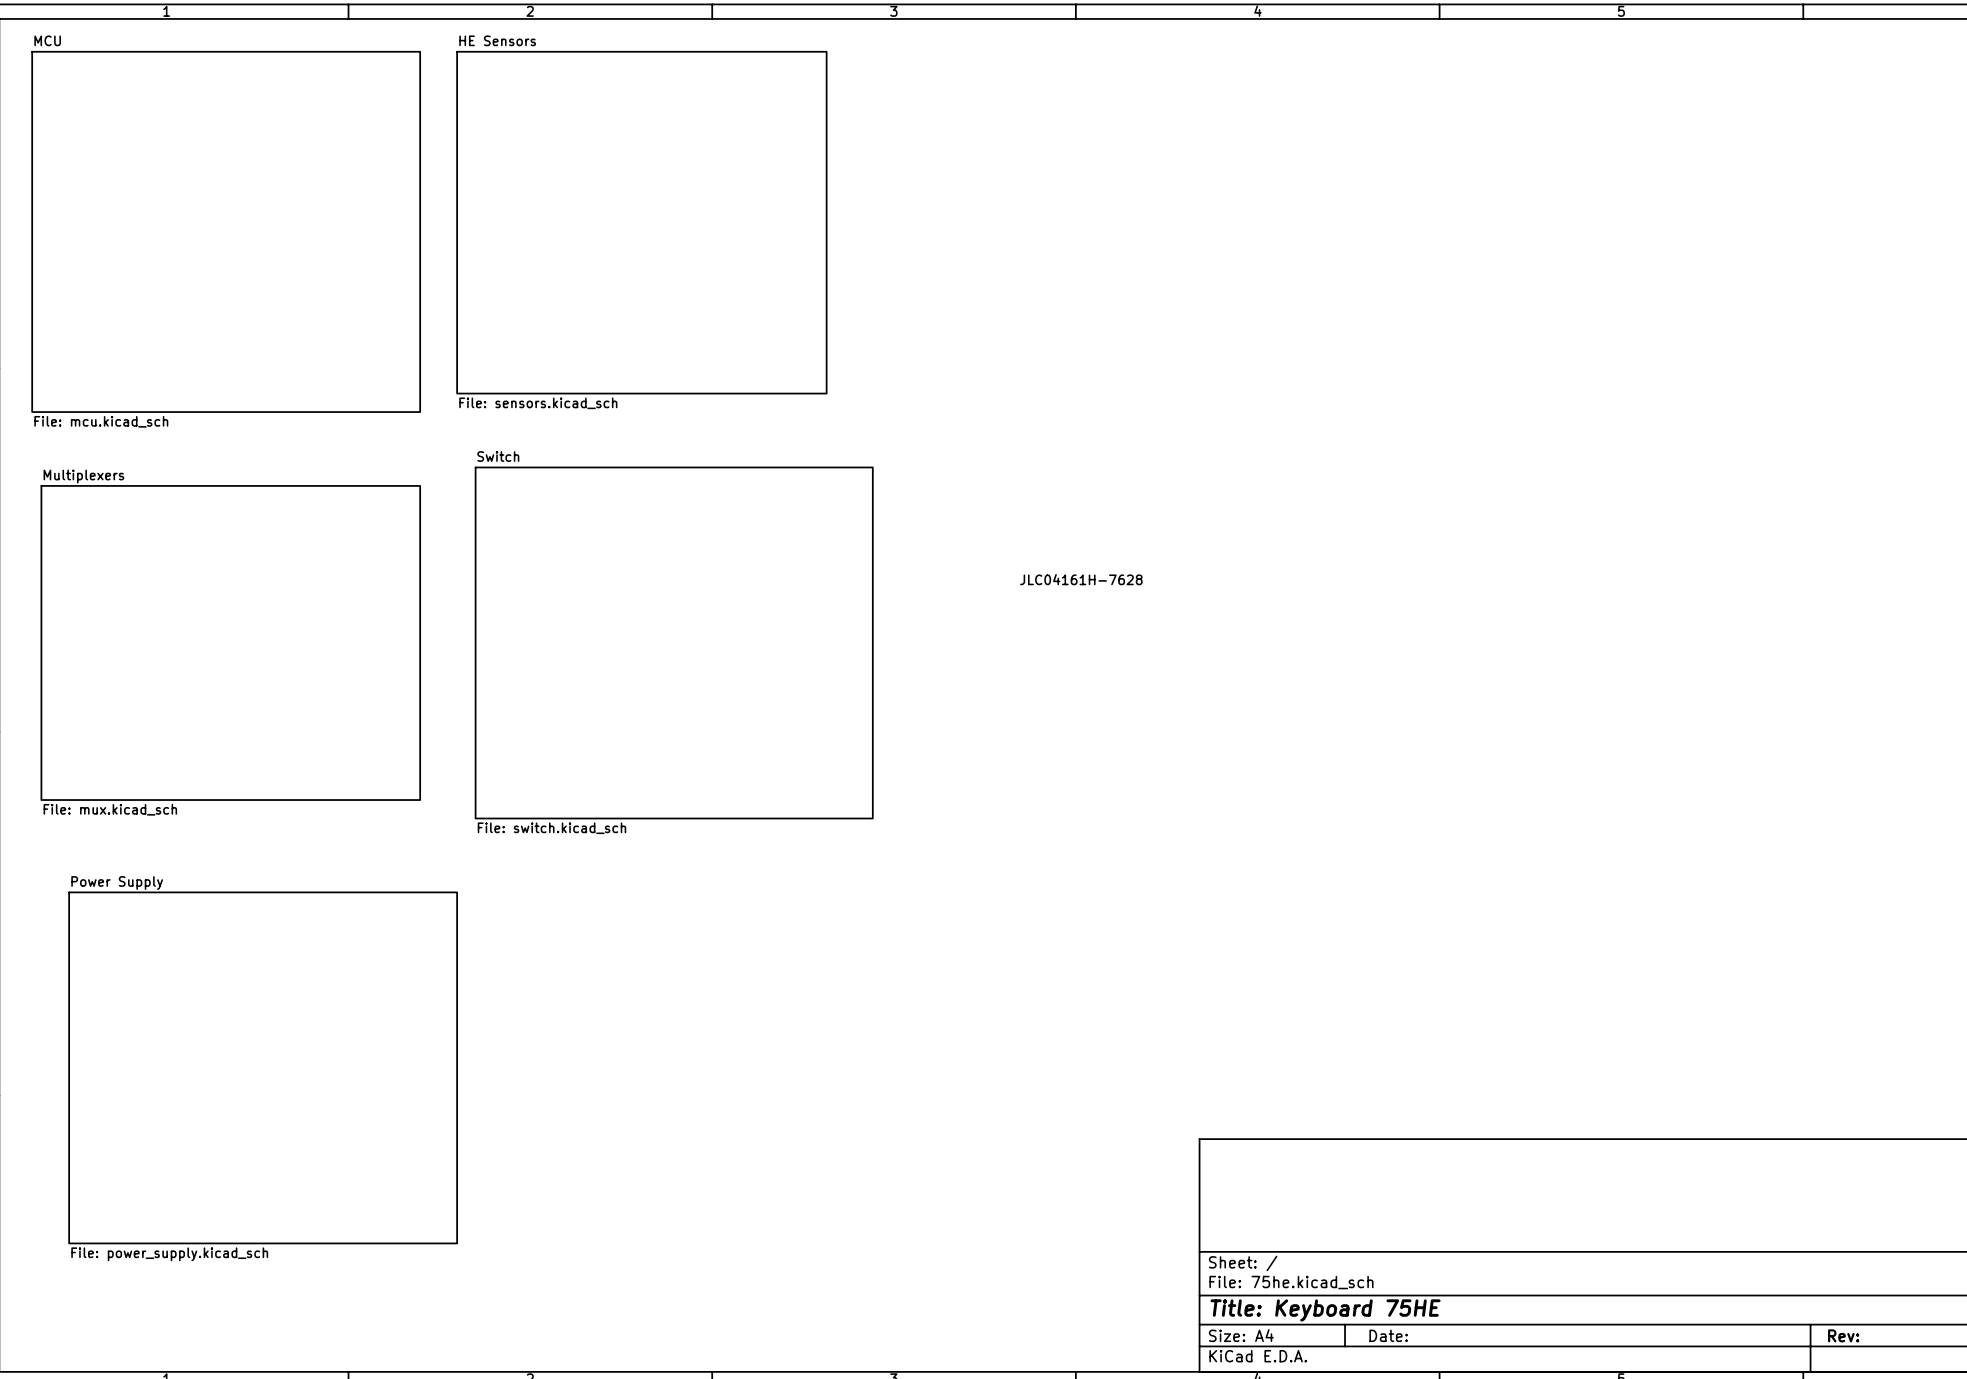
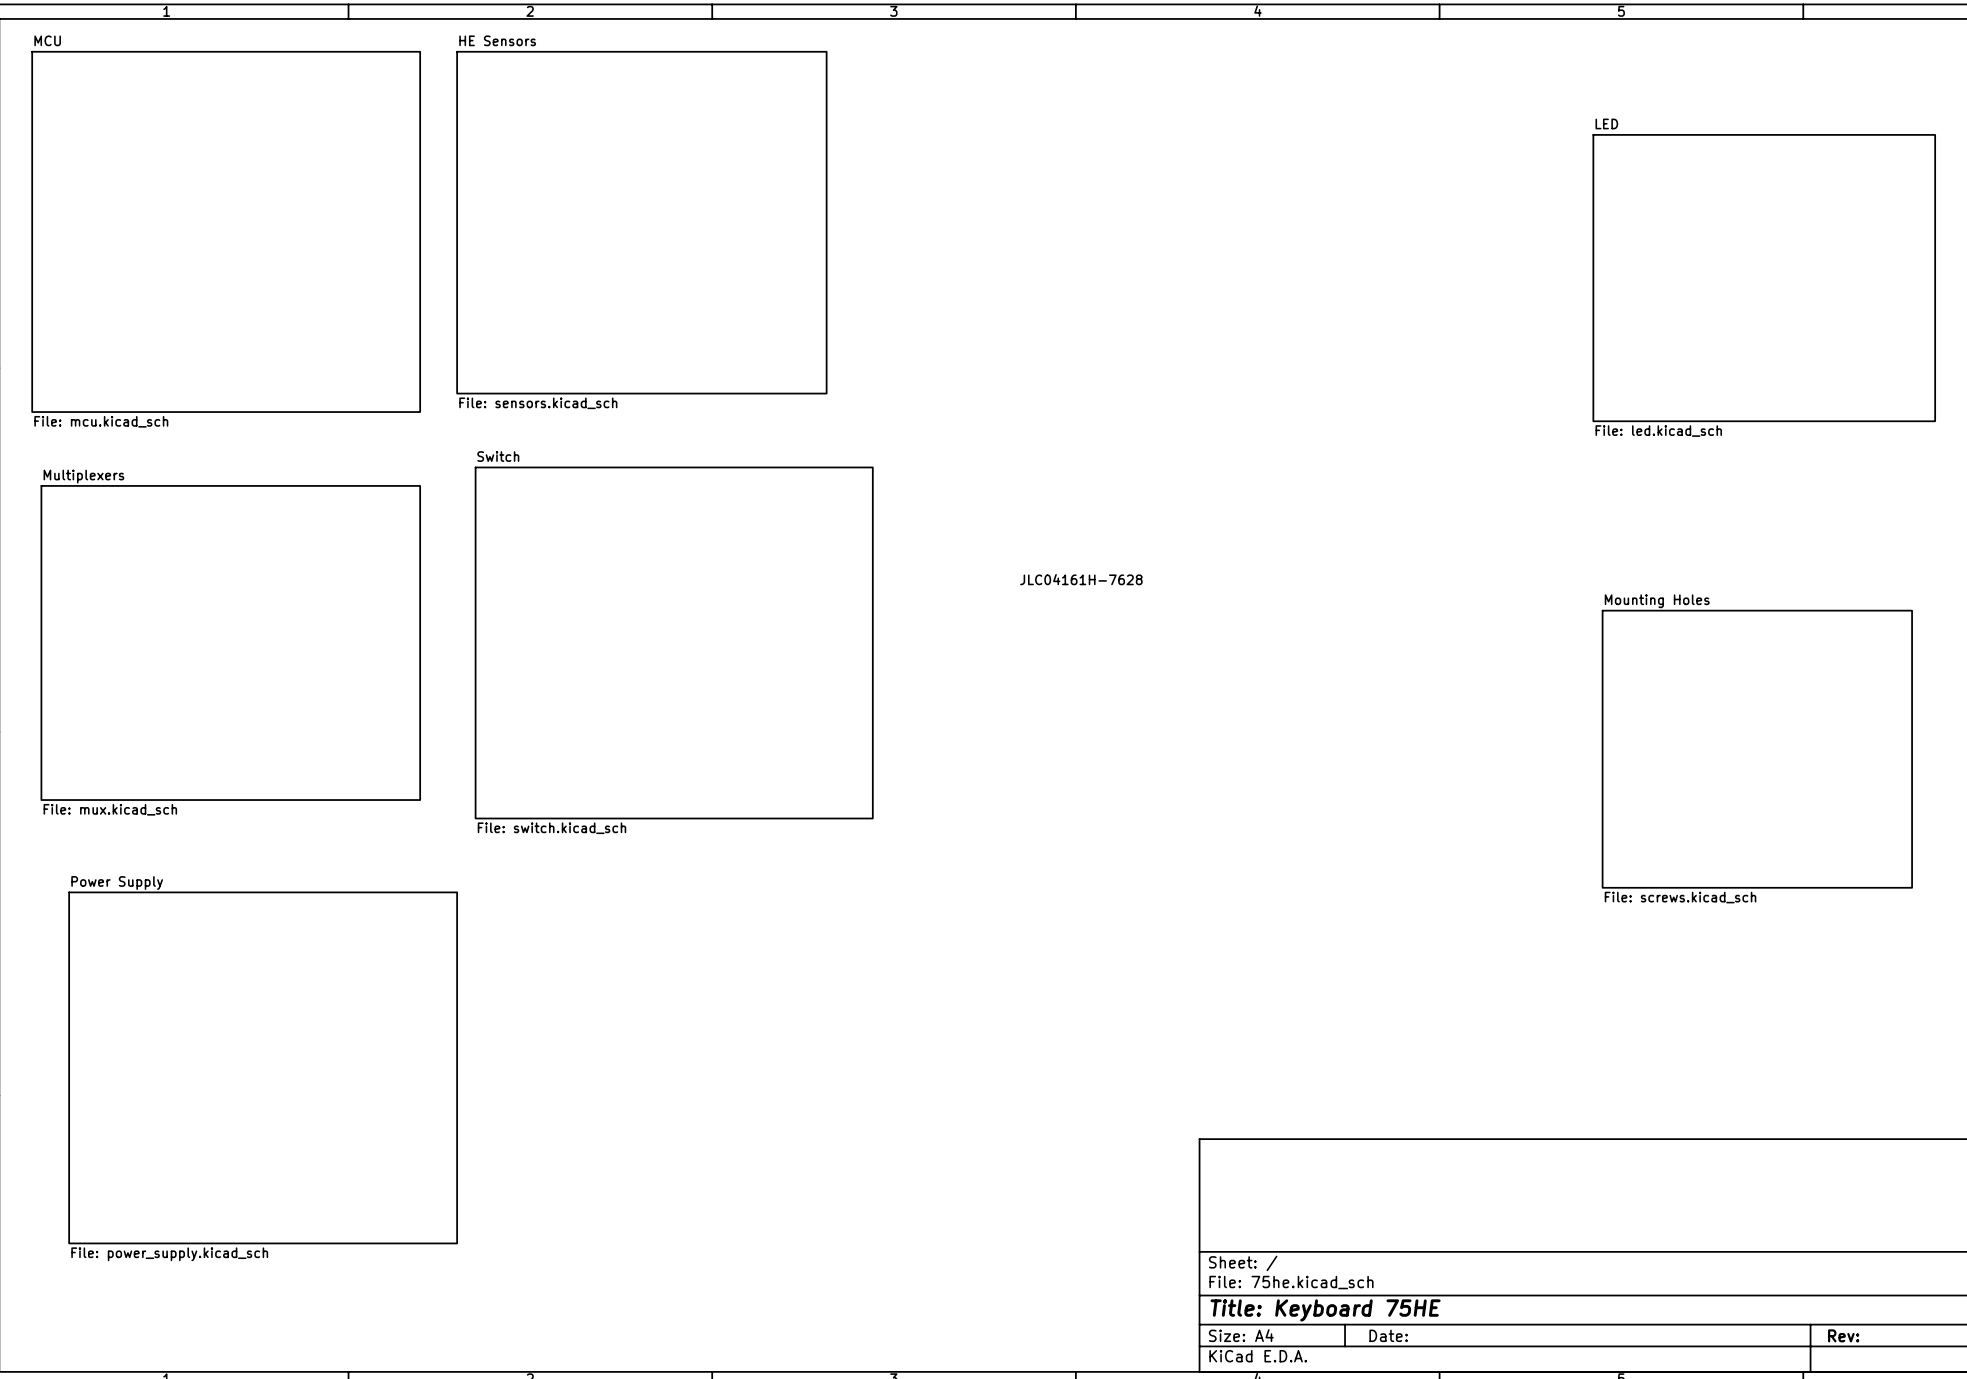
sheet LED: none -> File: led.kicad_sch (1764, 278)
sheet Mounting Holes: none -> File: screws.kicad_sch (1757, 749)

